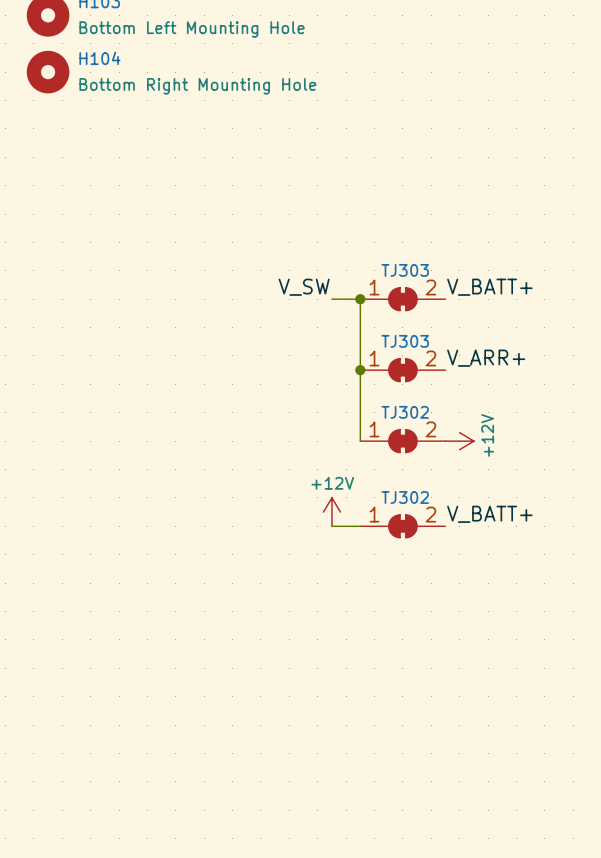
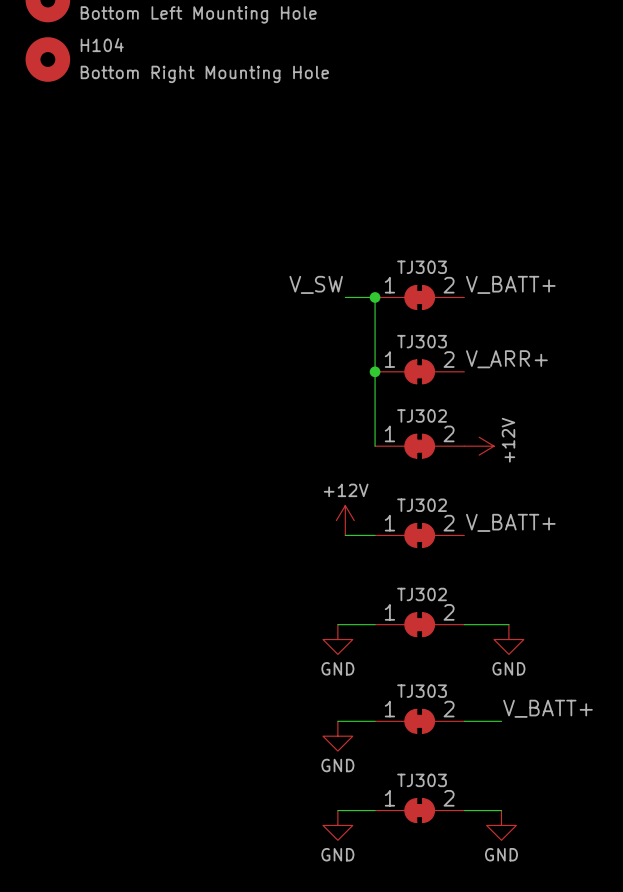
wire: none -> (337, 624) (375, 624)
TJ302: none -> (419, 624)
wire: none -> (464, 624) (508, 624)
power symbol: none -> GND (337, 639)
power symbol: none -> GND (508, 639)
label: none -> V_BATT+ (547, 708)
wire: none -> (337, 721) (375, 721)
TJ303: none -> (419, 721)
wire: none -> (464, 721) (501, 721)
power symbol: none -> GND (337, 736)
wire: none -> (337, 810) (375, 810)
TJ303: none -> (419, 810)
wire: none -> (464, 810) (501, 810)
power symbol: none -> GND (337, 825)
power symbol: none -> GND (501, 825)

